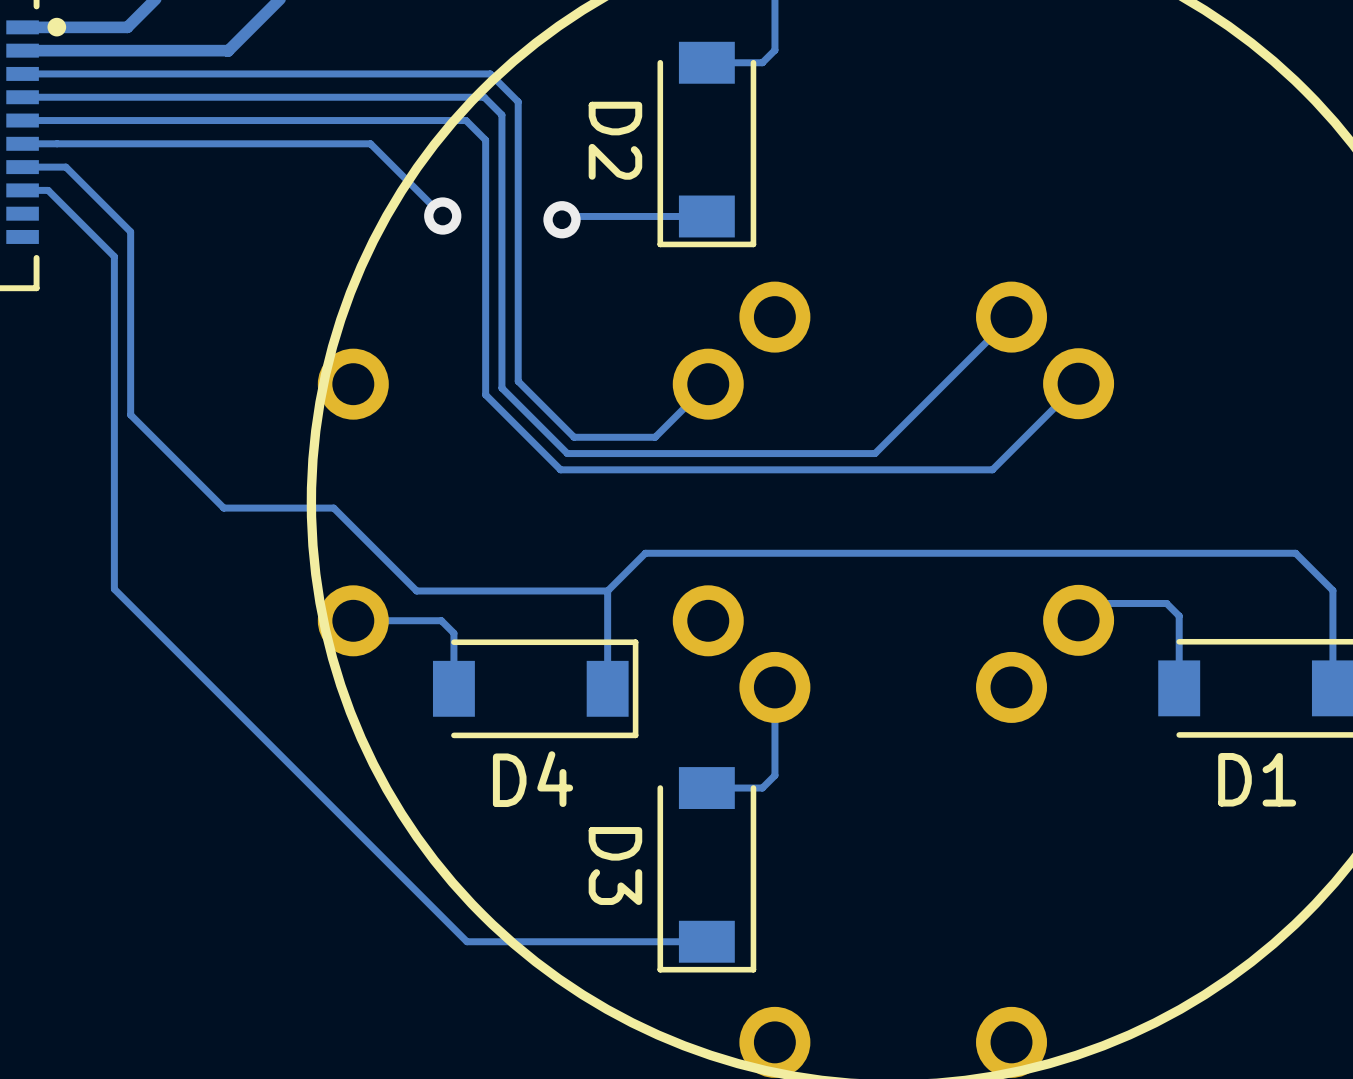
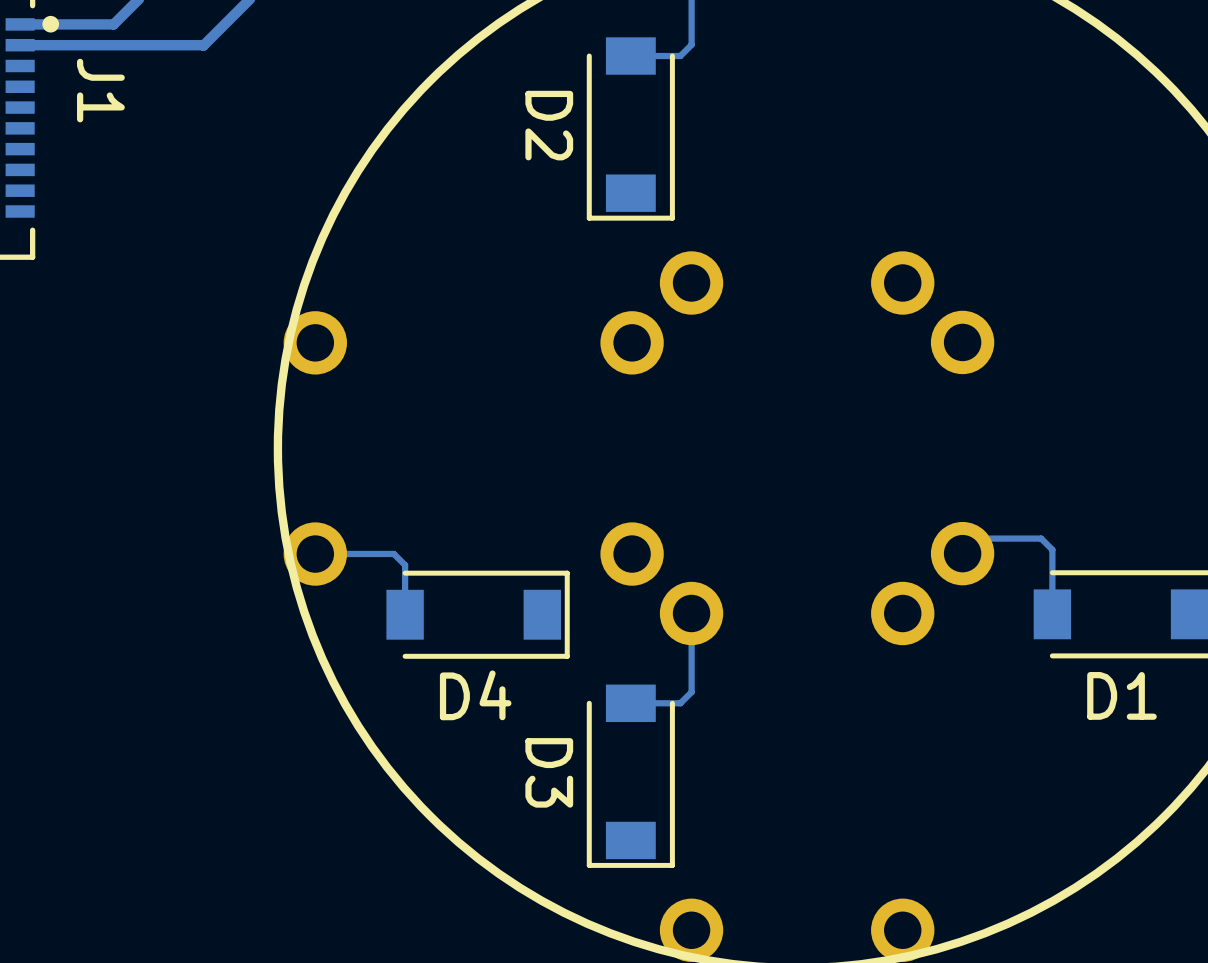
track: (22, 73) (490, 73) (518, 101) (518, 381) (574, 437) (655, 437) (708, 384) -> none
track: (22, 97) (484, 97) (501, 114) (501, 388) (567, 453) (875, 453) (1011, 317) -> none
J1 name: none -> J1 (100, 90)
track: (22, 120) (466, 120) (485, 140) (485, 394) (560, 469) (992, 469) (1078, 383) -> none
track: (22, 143) (370, 143) (442, 216) -> none
track: (22, 167) (65, 167) (130, 231) (130, 414) (223, 508) (333, 508) (416, 590) (607, 590) -> none
track: (22, 190) (48, 190) (114, 256) (114, 589) (466, 941) (706, 941) -> none
via: (442, 216) -> none
track: (706, 216) (565, 216) (562, 219) -> none
via: (562, 219) -> none
track: (607, 590) (607, 688) -> none
track: (607, 590) (645, 553) (1295, 553) (1332, 590) (1332, 688) -> none

